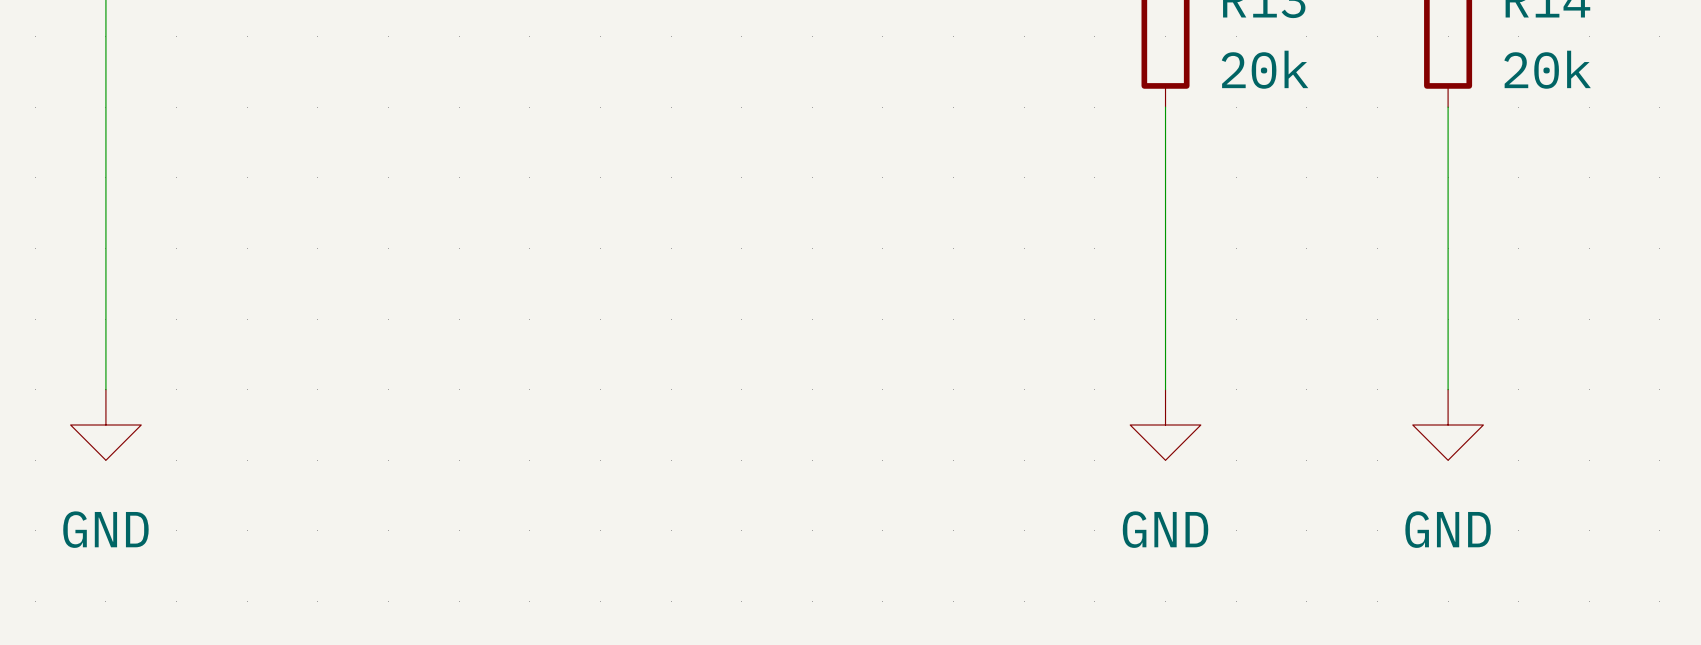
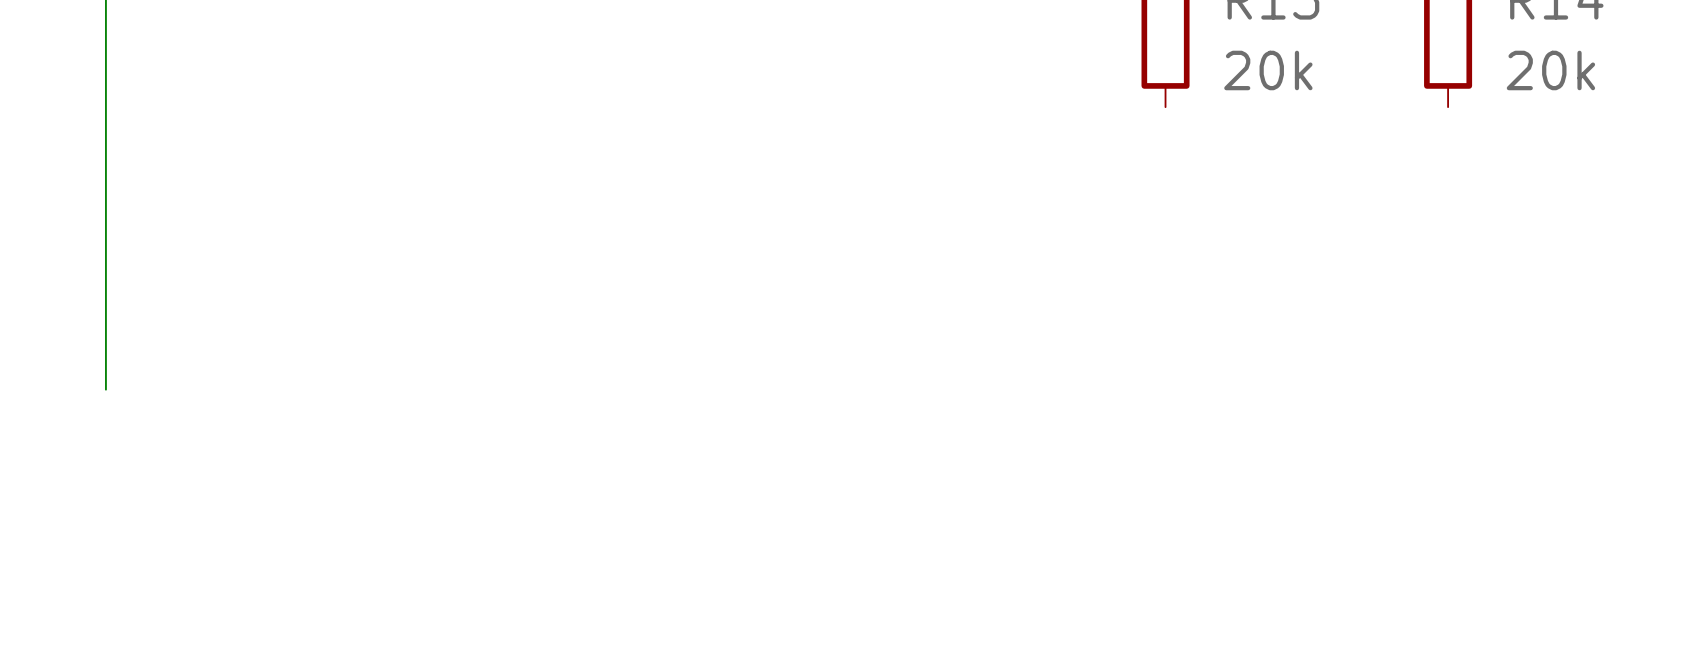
wire: (1165, 107) (1165, 389) -> none
wire: (1448, 107) (1448, 389) -> none
power symbol: GND (105, 425) -> none
power symbol: GND (1165, 425) -> none
power symbol: GND (1448, 425) -> none

